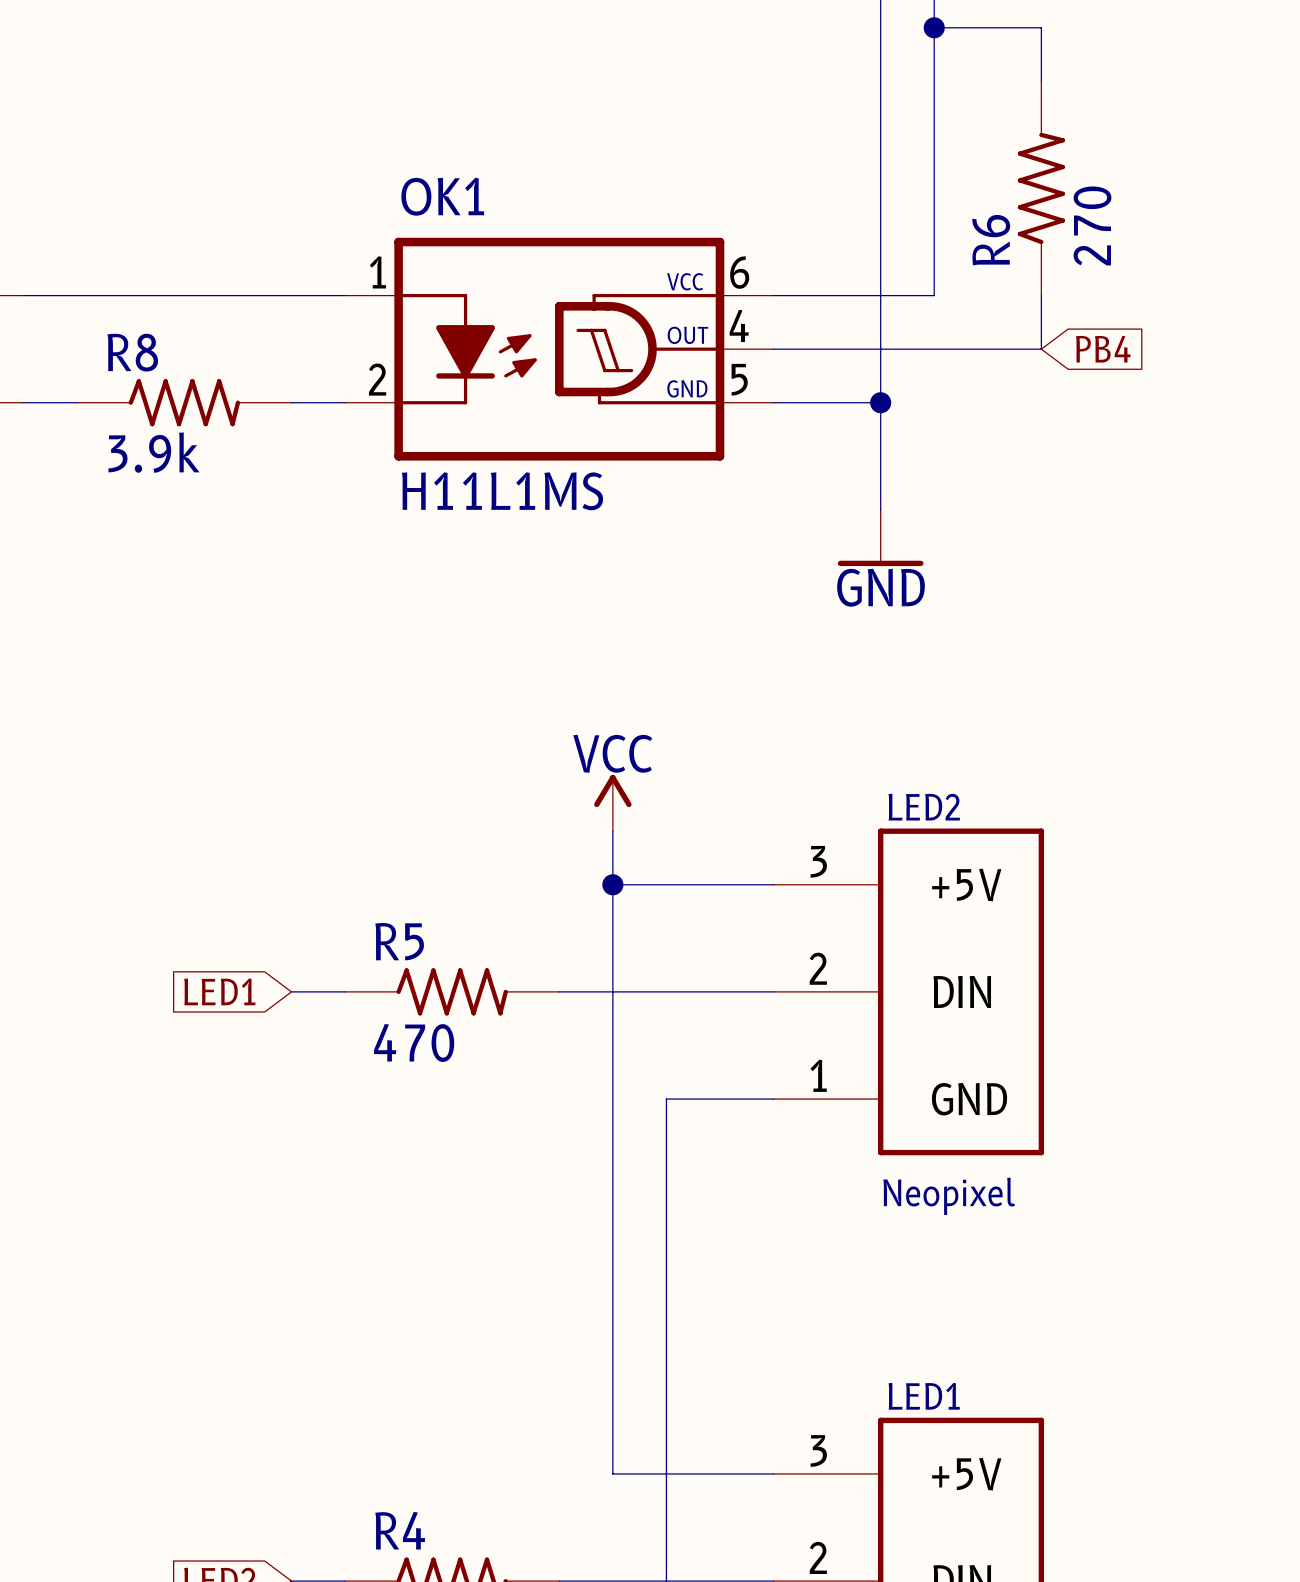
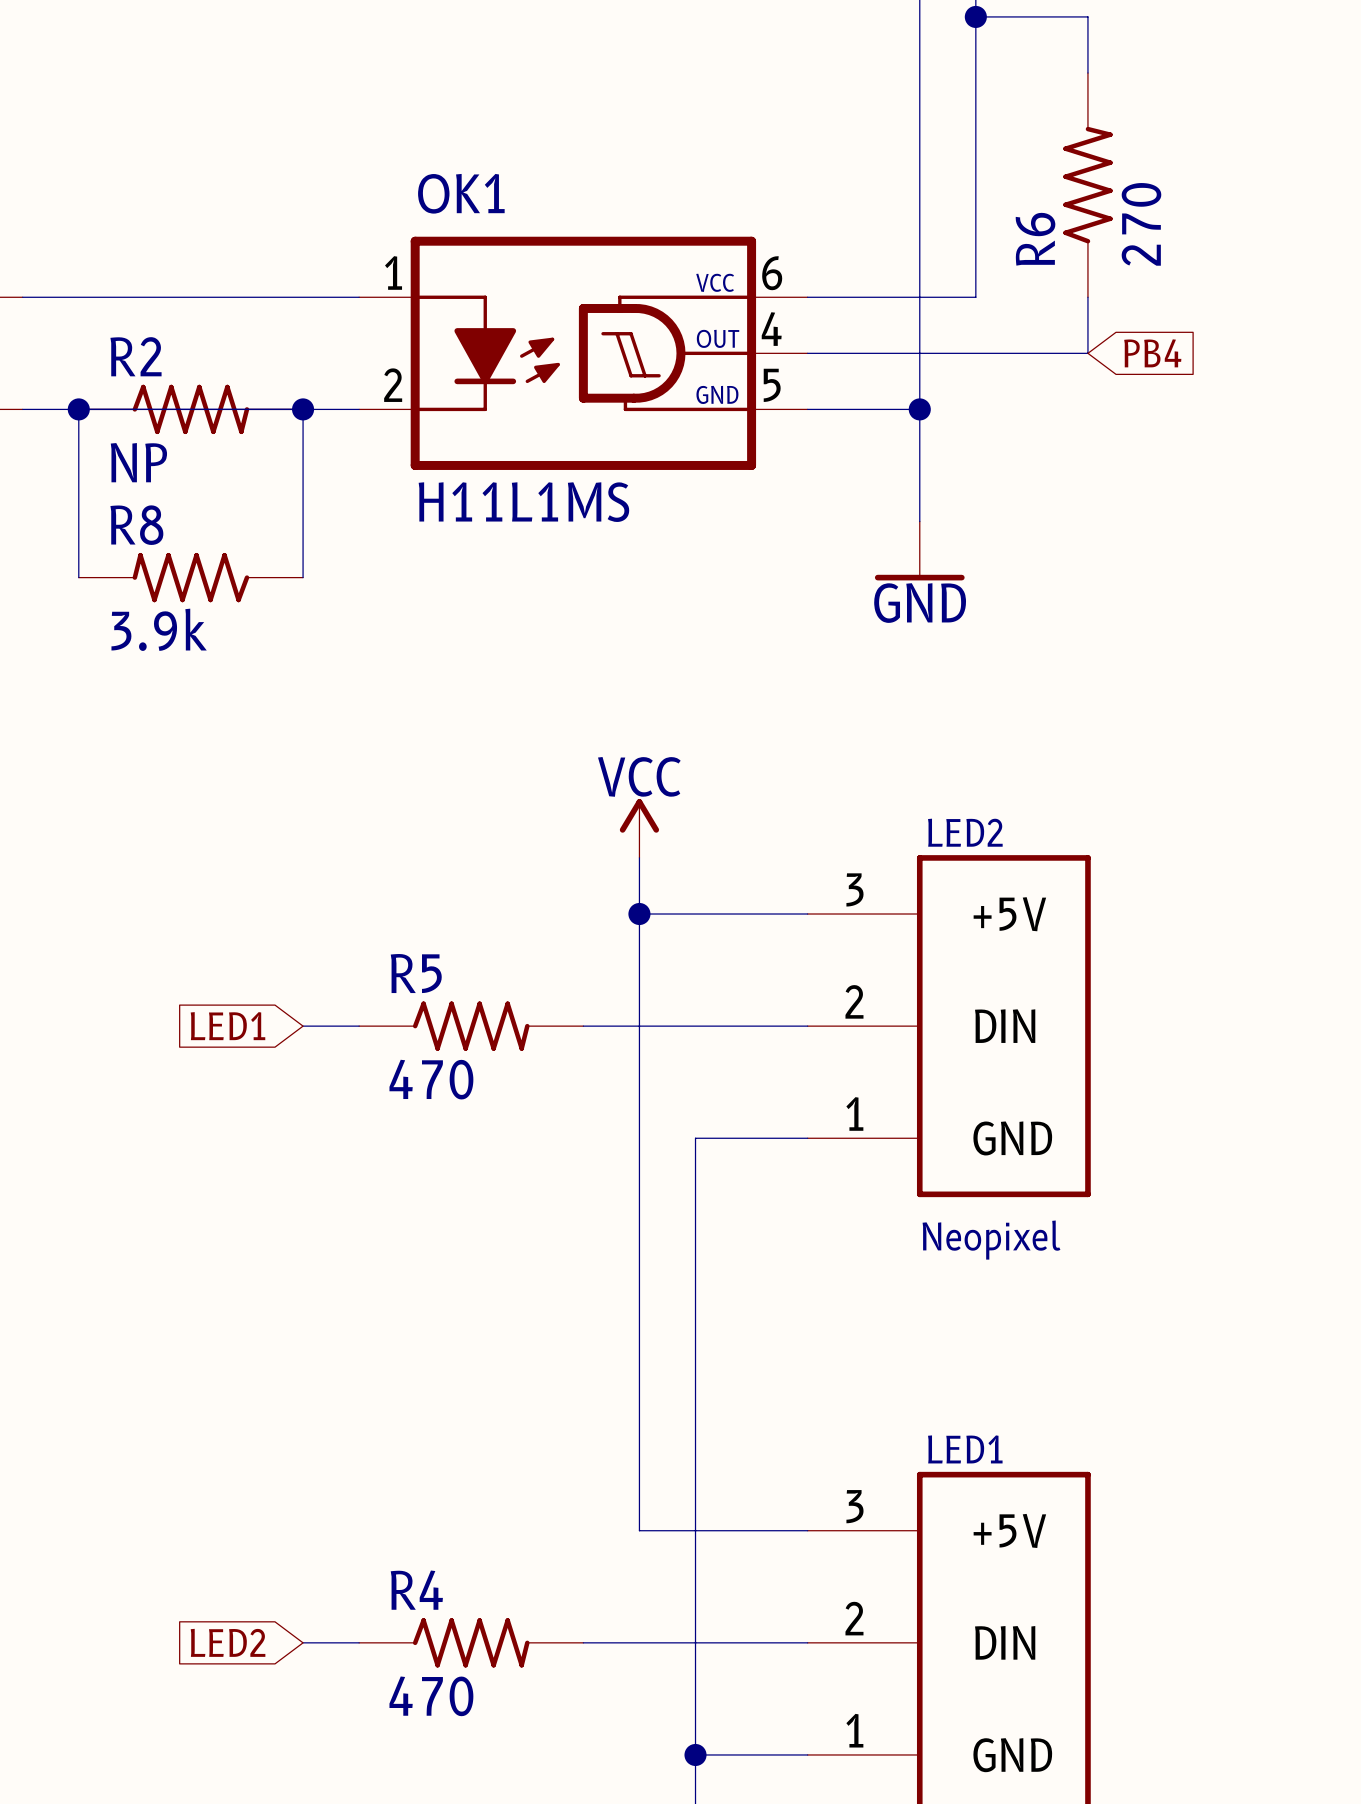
R8 name: R8 (132, 352) -> R2 (135, 356)
junction: none -> (78, 409)
junction: none -> (303, 409)
R8 value: 3.9k (153, 452) -> NP (138, 462)
wire: none -> (78, 577) (78, 409) (303, 409) (303, 577)
R8: none -> 3.9k (190, 577)

